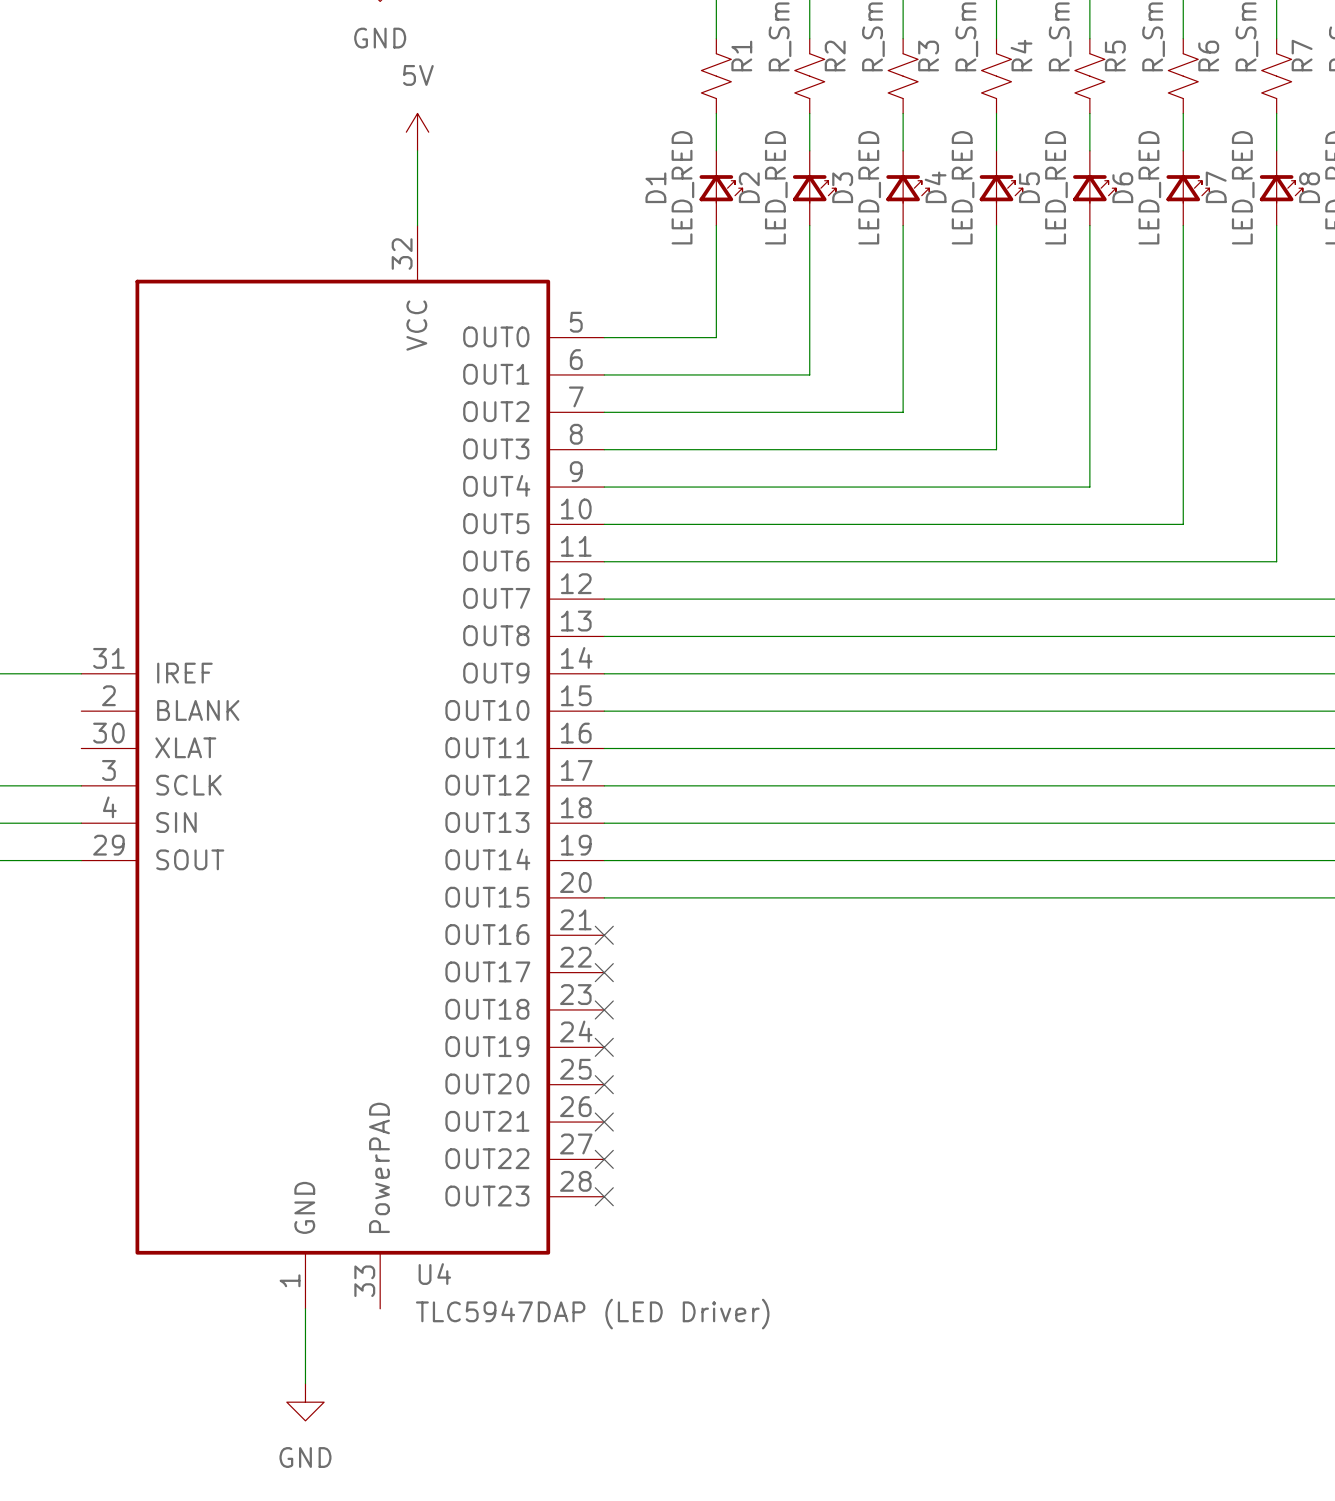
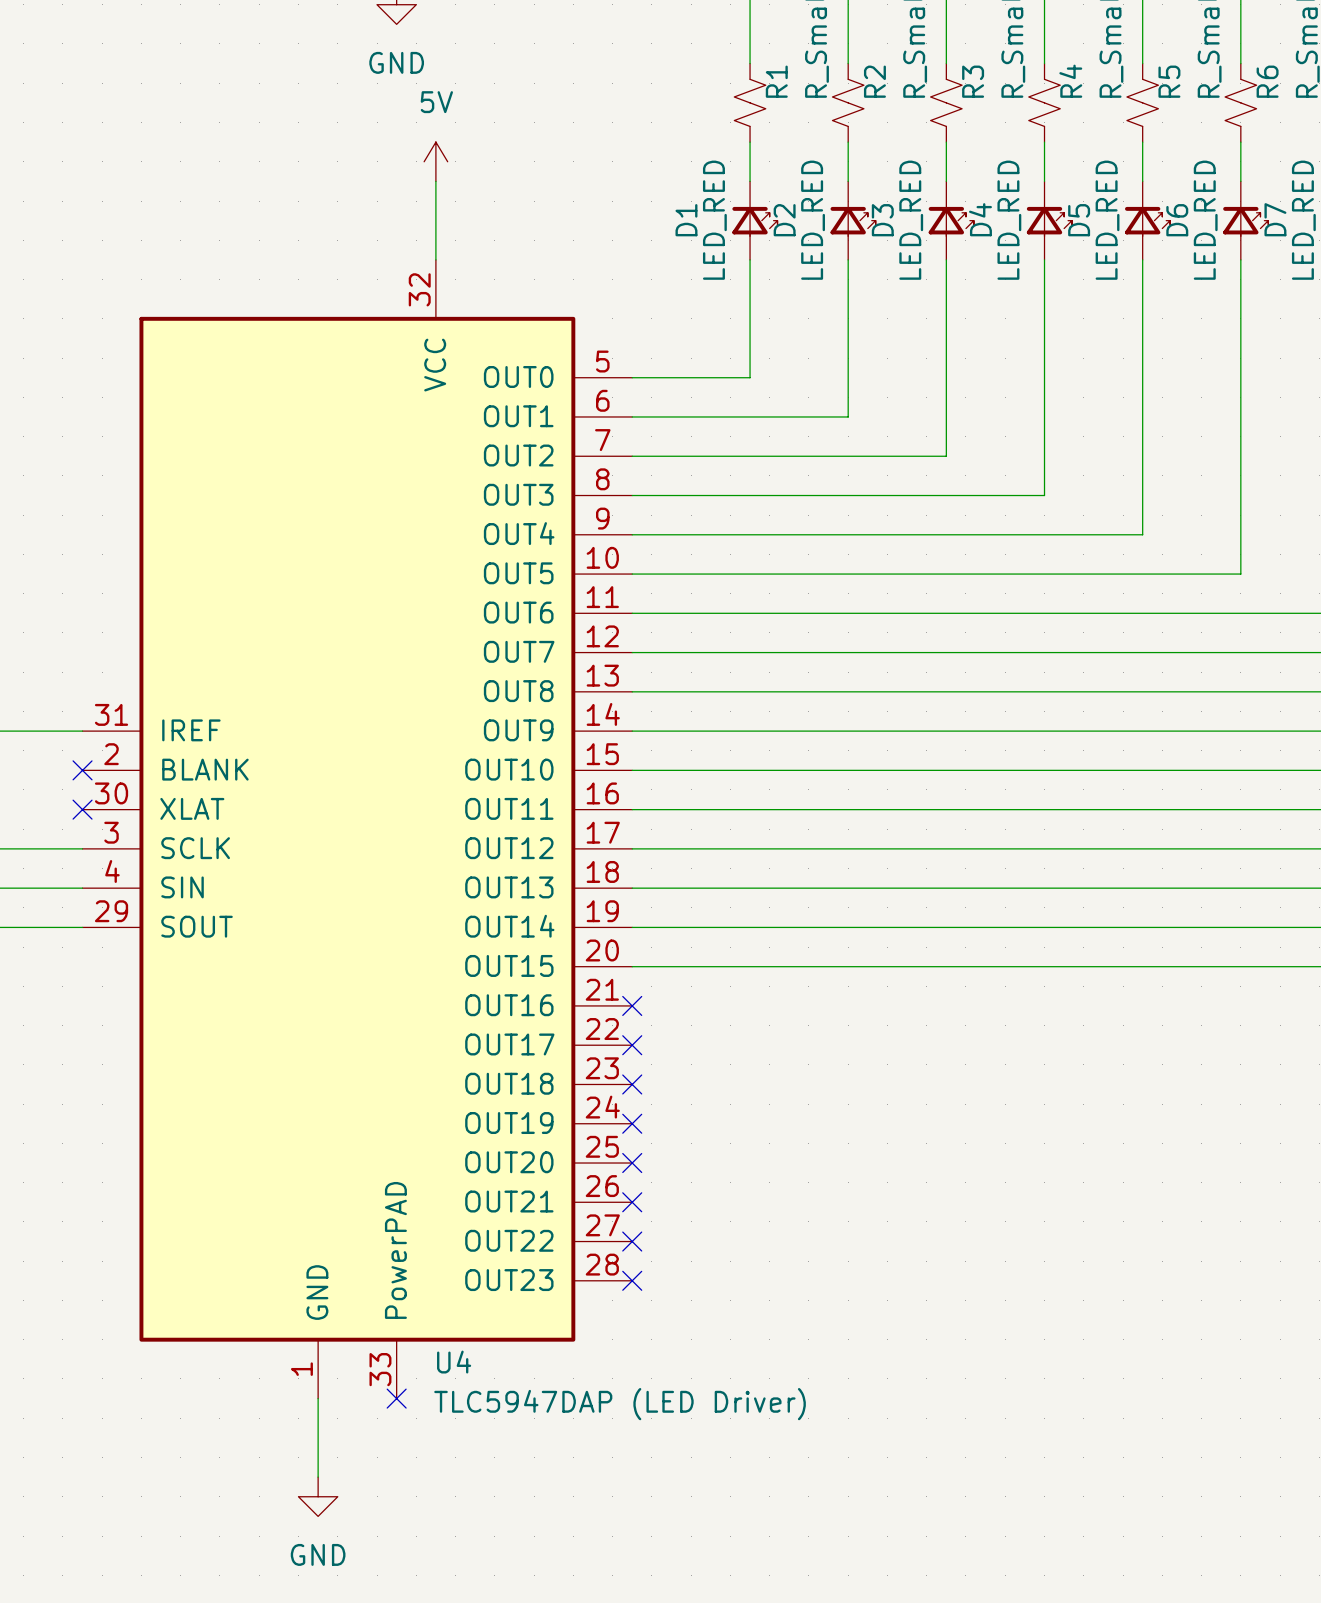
no-connect mark: none -> (82, 770)
no-connect mark: none -> (82, 809)
no-connect mark: none -> (396, 1398)

